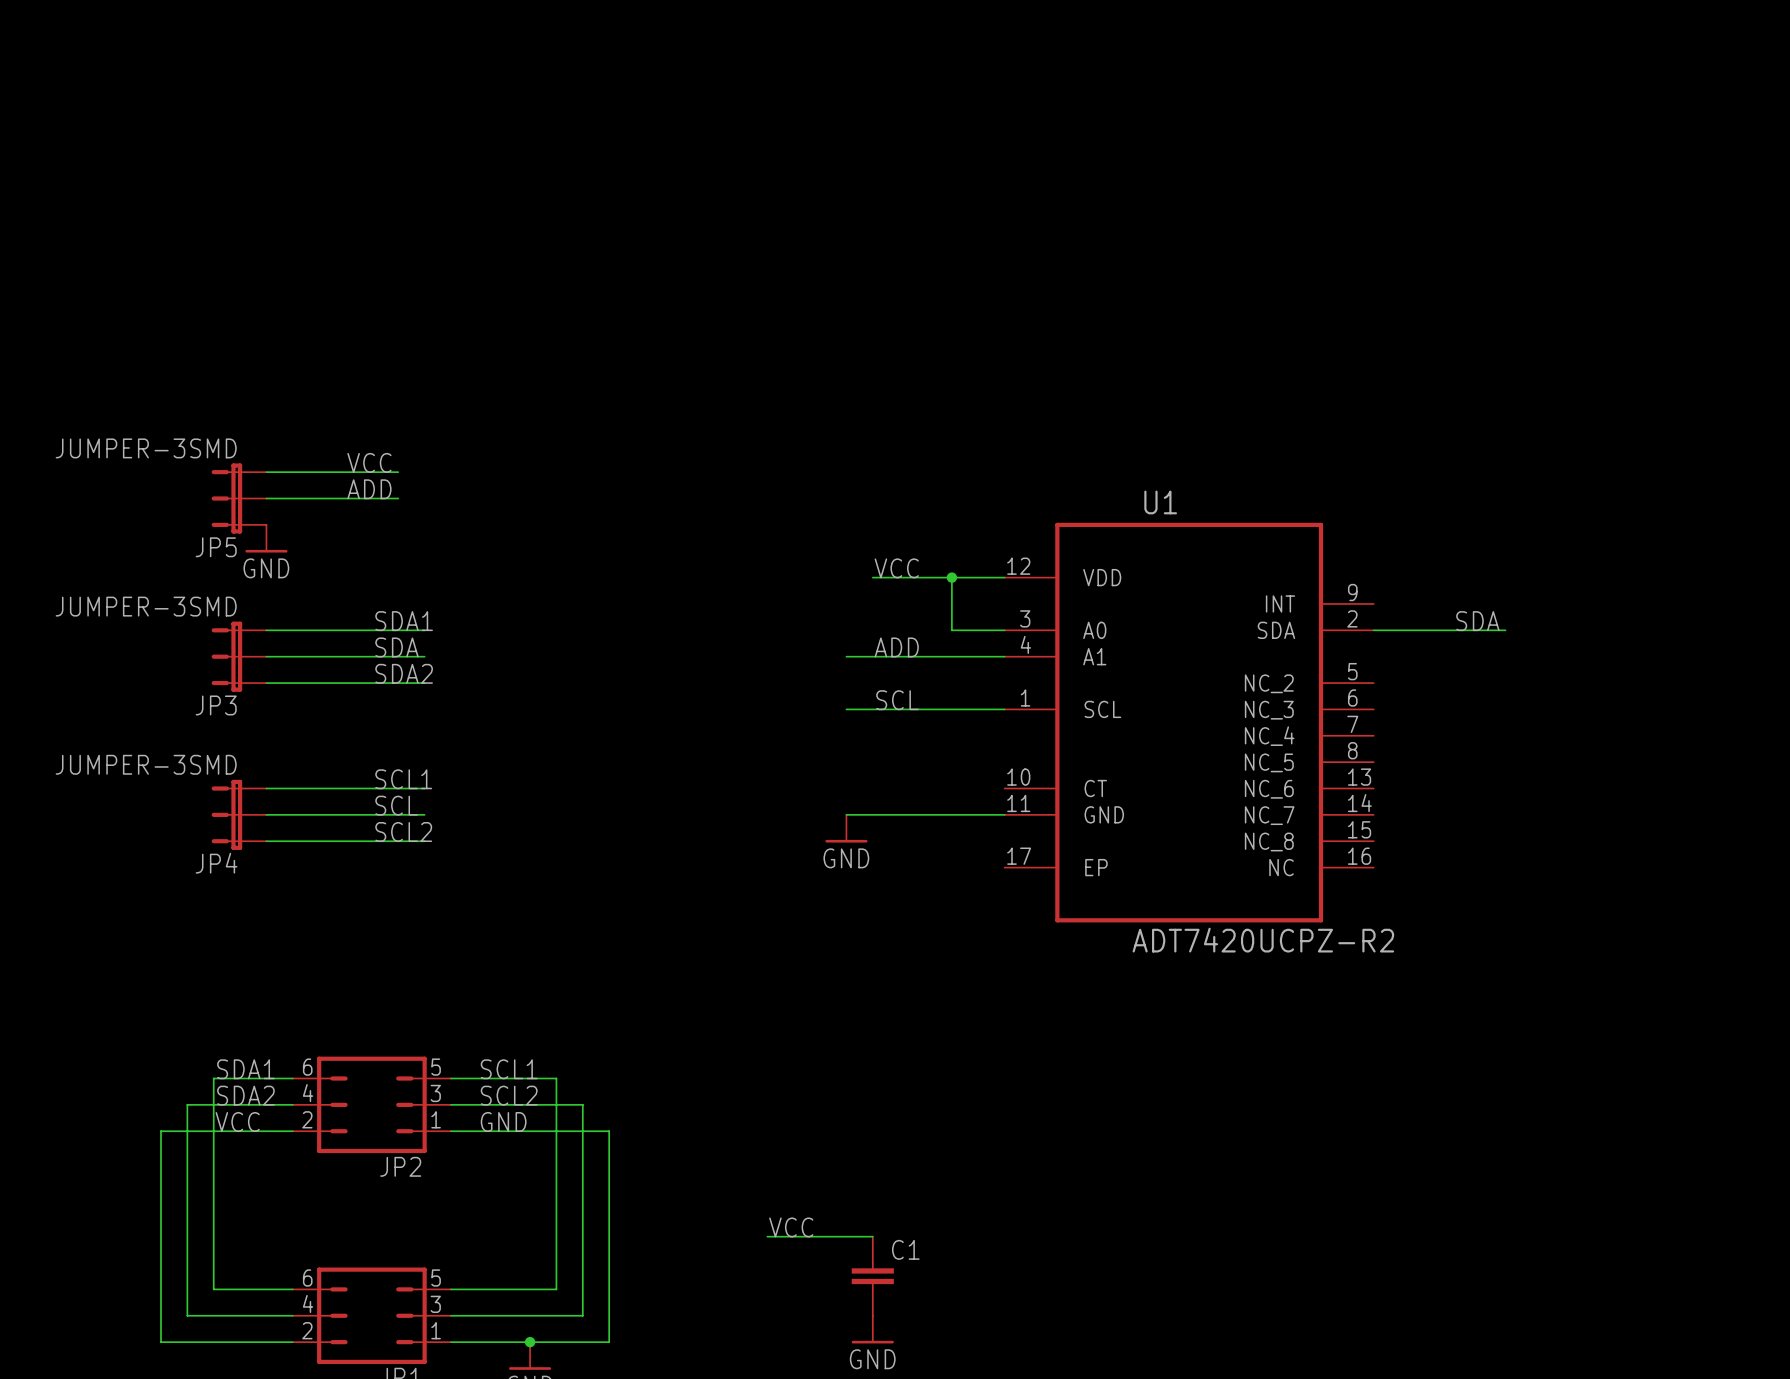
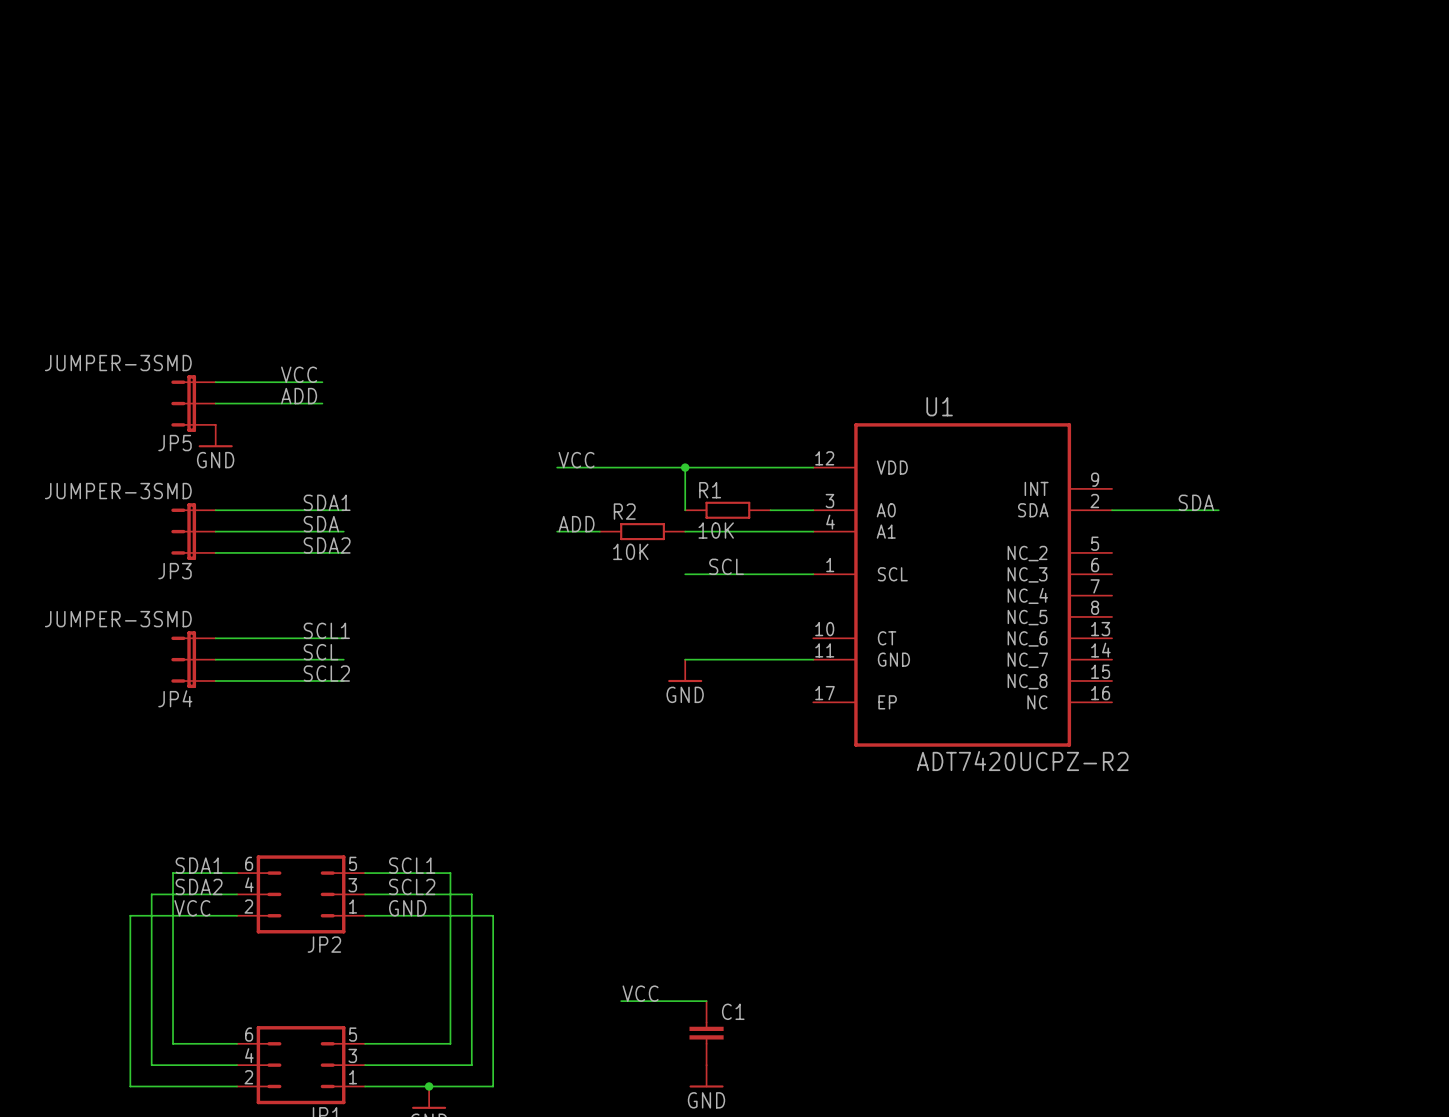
label position: VCC (896, 568) -> VCC (576, 460)
wire: none -> (557, 467) (706, 467)
junction: none -> (685, 467)
wire: (951, 577) (951, 630) -> (685, 467) (685, 510)
junction: (951, 577) -> none
R1: none -> 10K (727, 510)
label position: ADD (896, 647) -> ADD (576, 524)
wire: none -> (557, 531) (599, 531)
R2: none -> 10K (642, 531)

